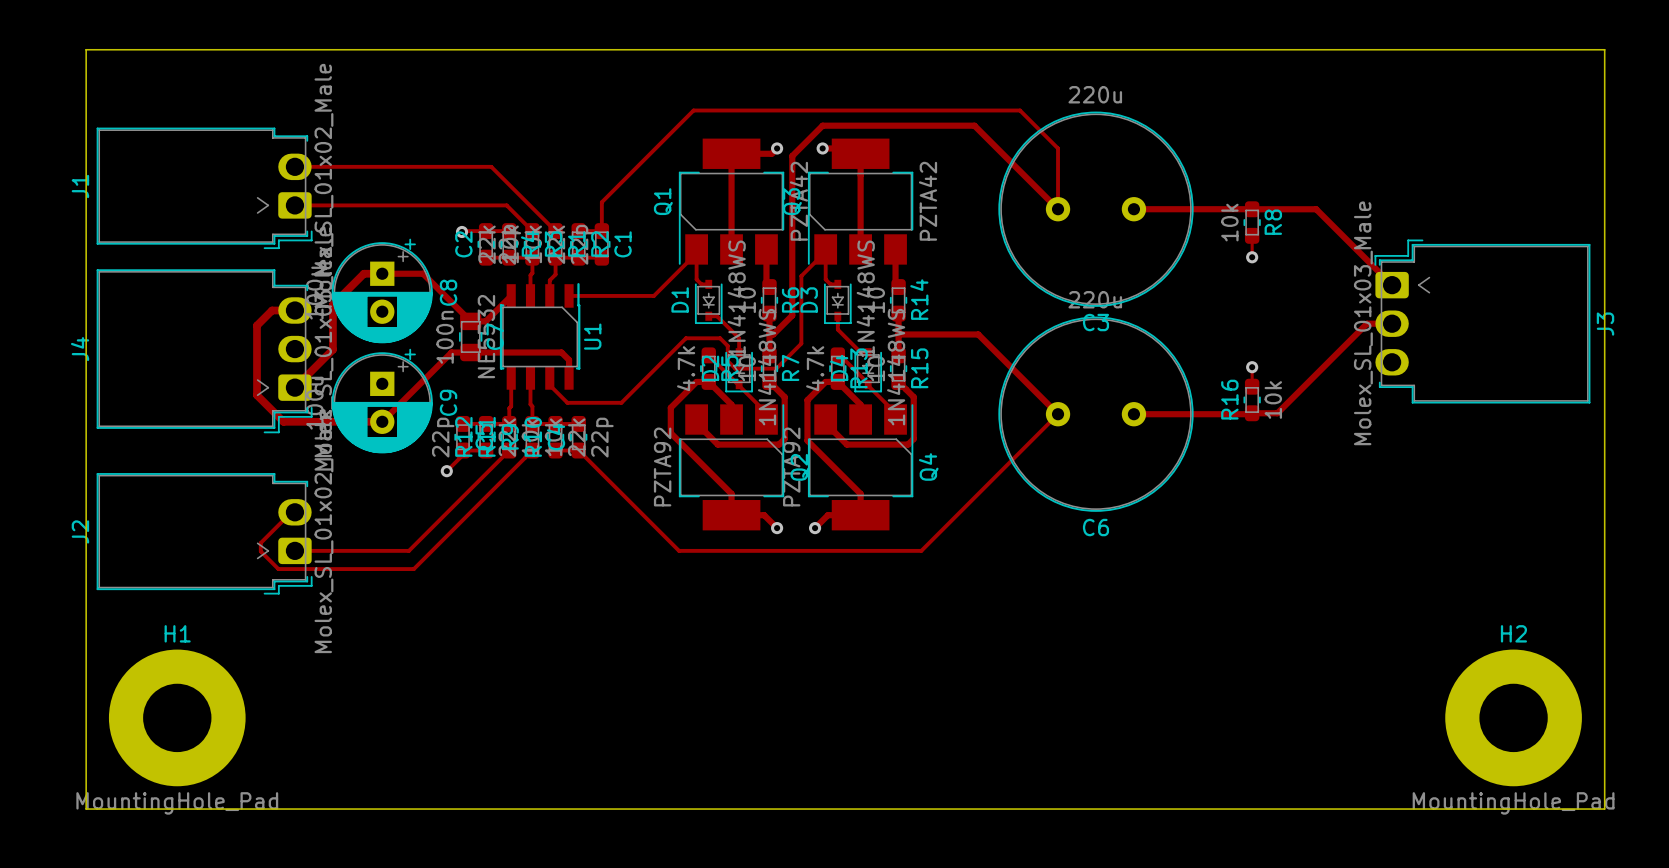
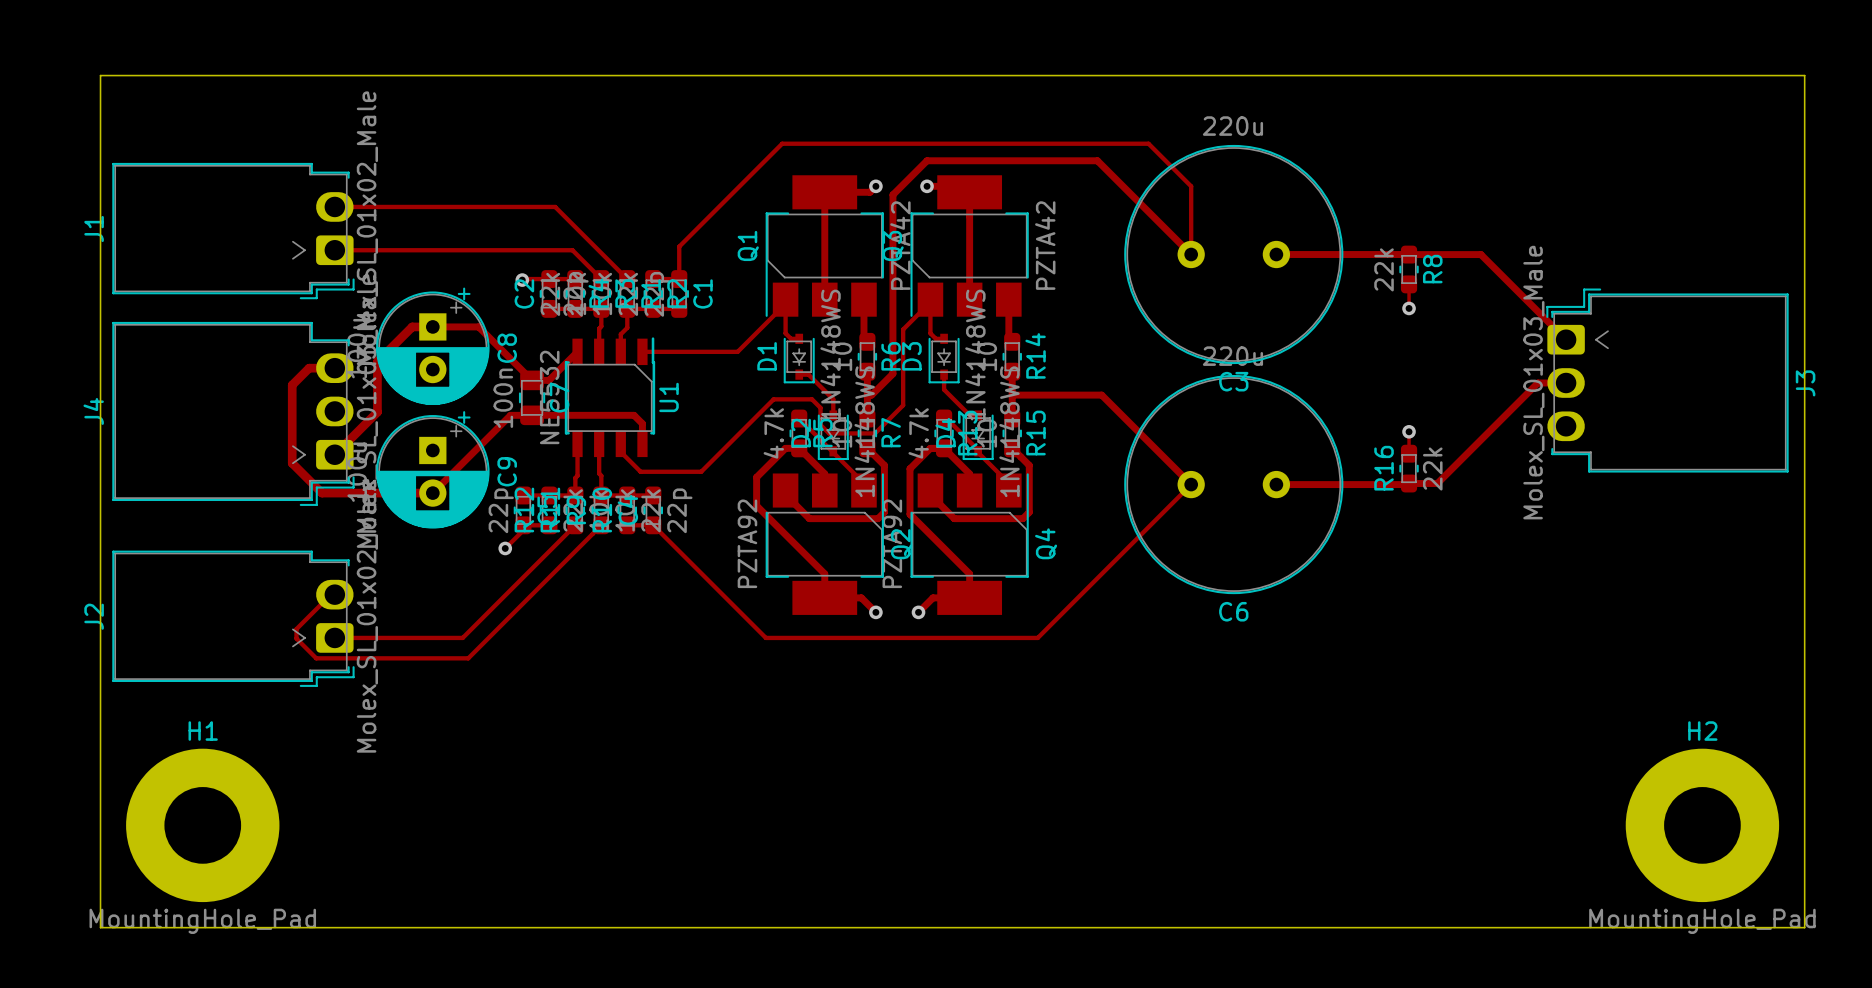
R8 value: 10k (1229, 222) -> 22k (1384, 269)
R16 value: 10k (1273, 399) -> 22k (1432, 469)

